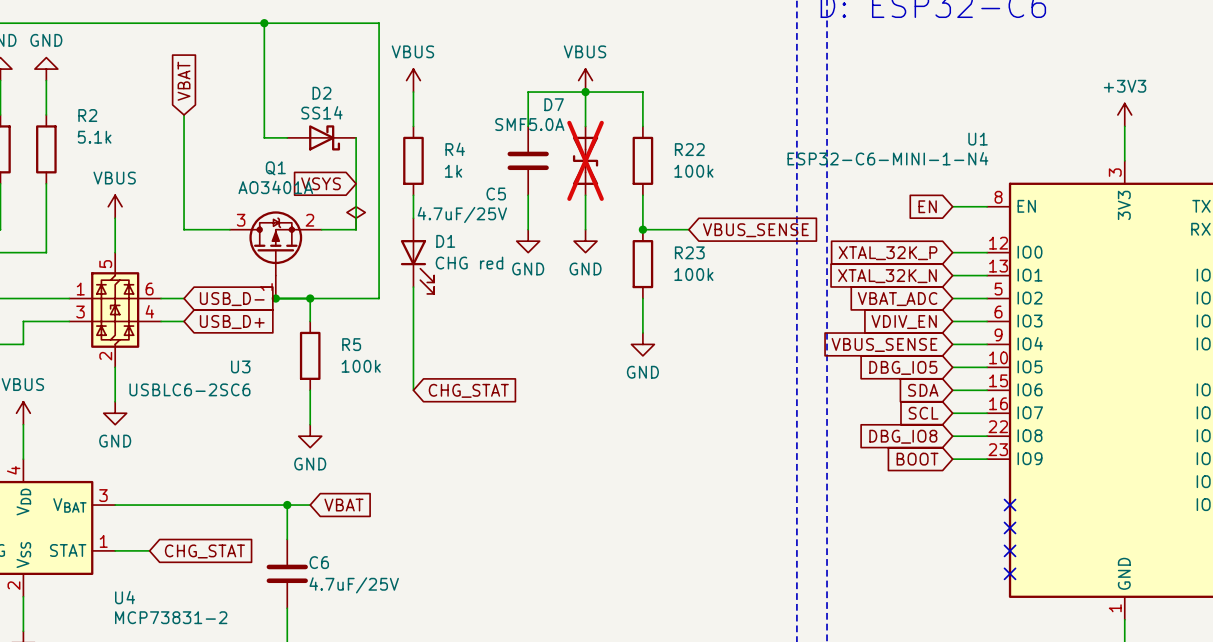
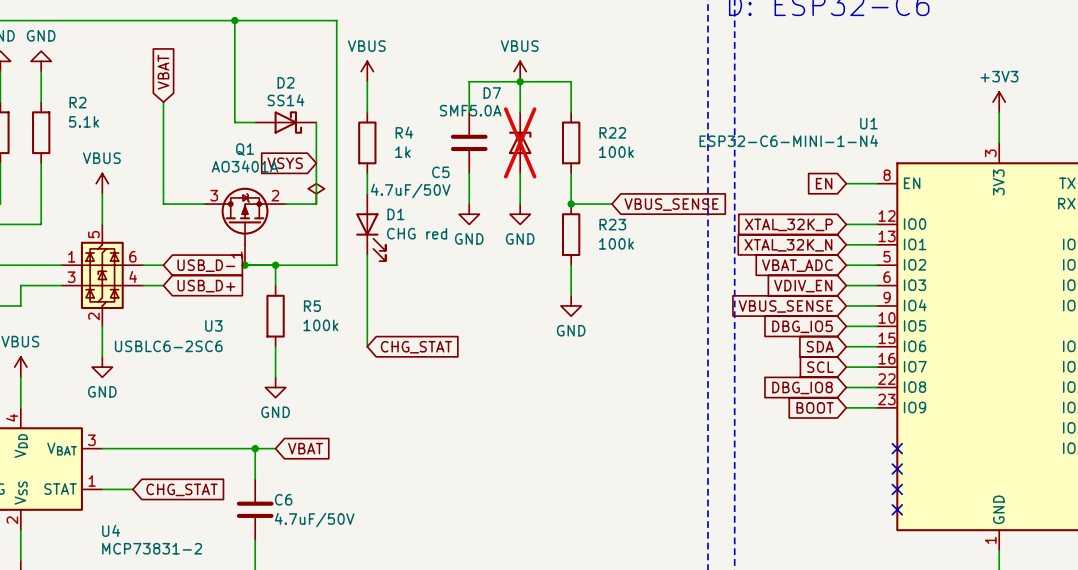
D7 symbol: [572, 126, 599, 196] -> [508, 112, 532, 174]
C5 value: 4.7uF/25V (462, 214) -> 4.7uF/50V (410, 190)
C6 value: 4.7uF/25V (354, 585) -> 4.7uF/50V (314, 520)

